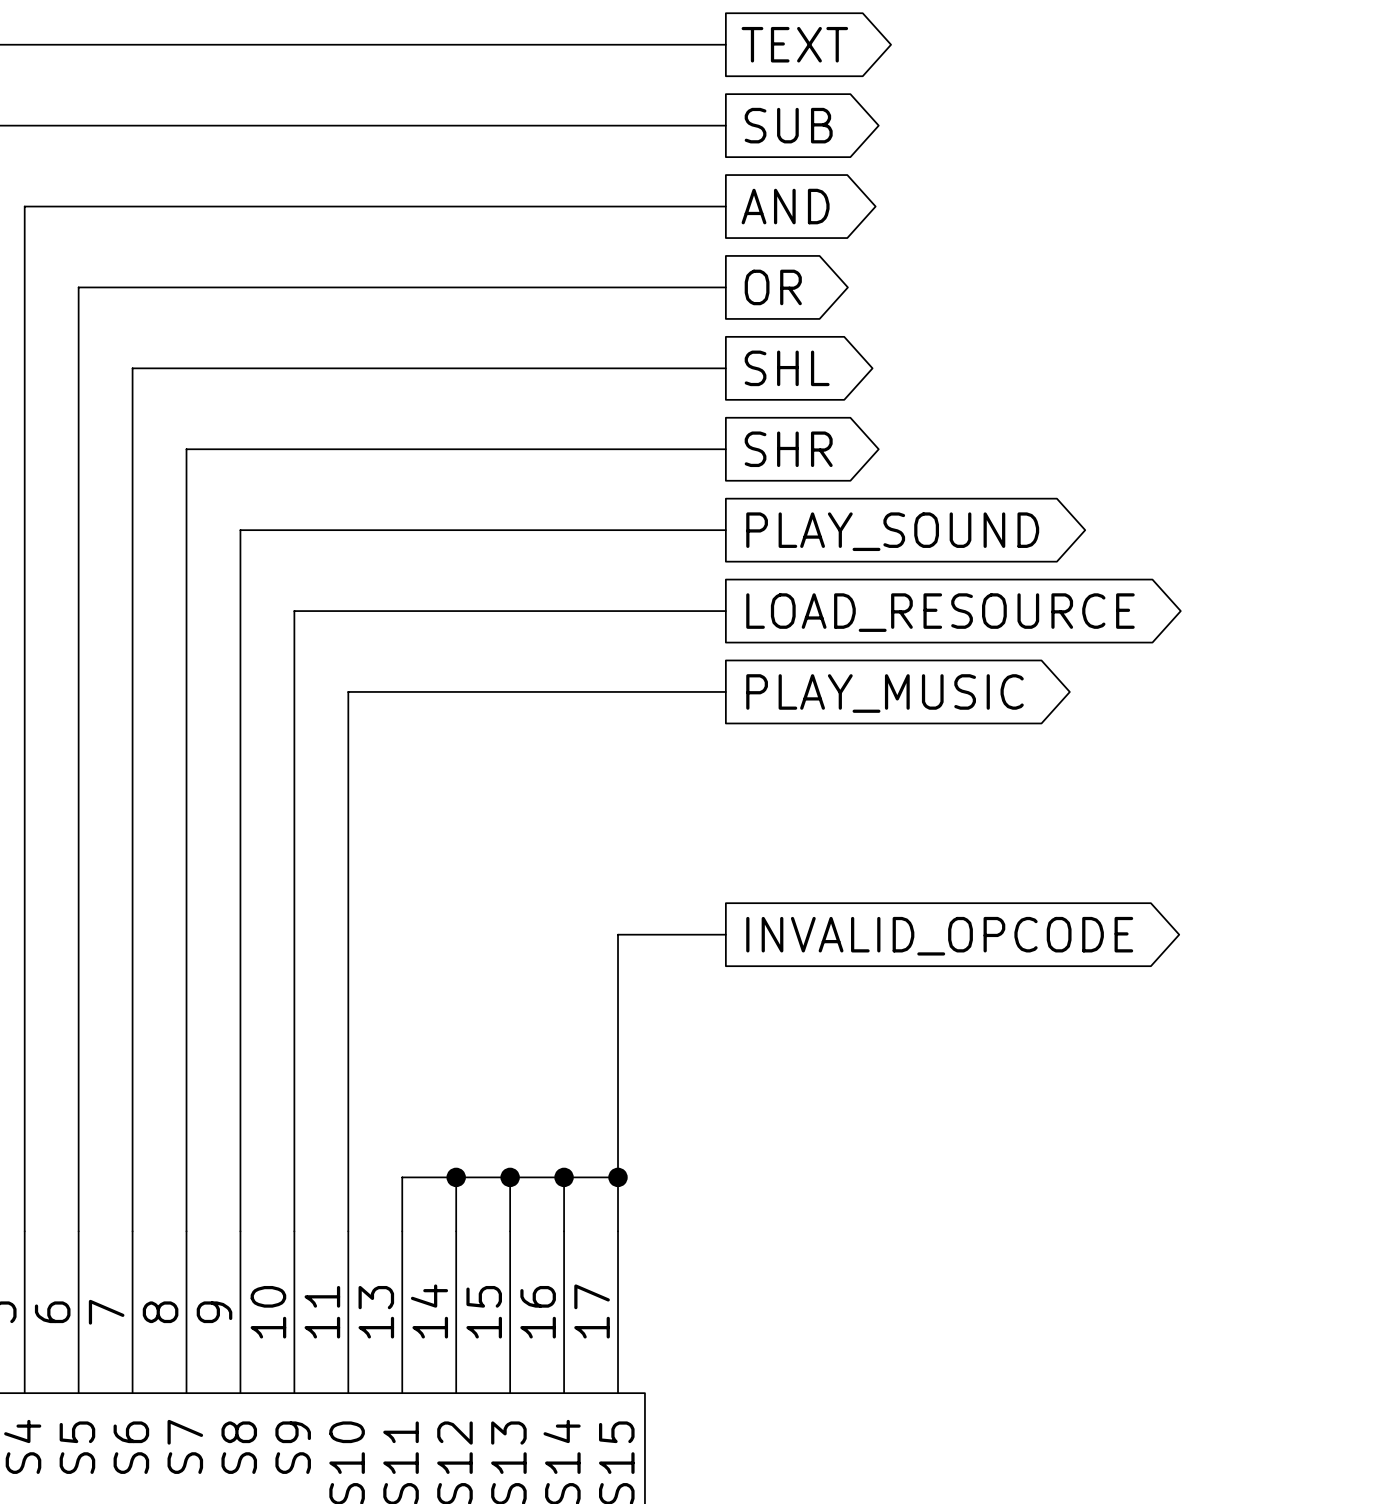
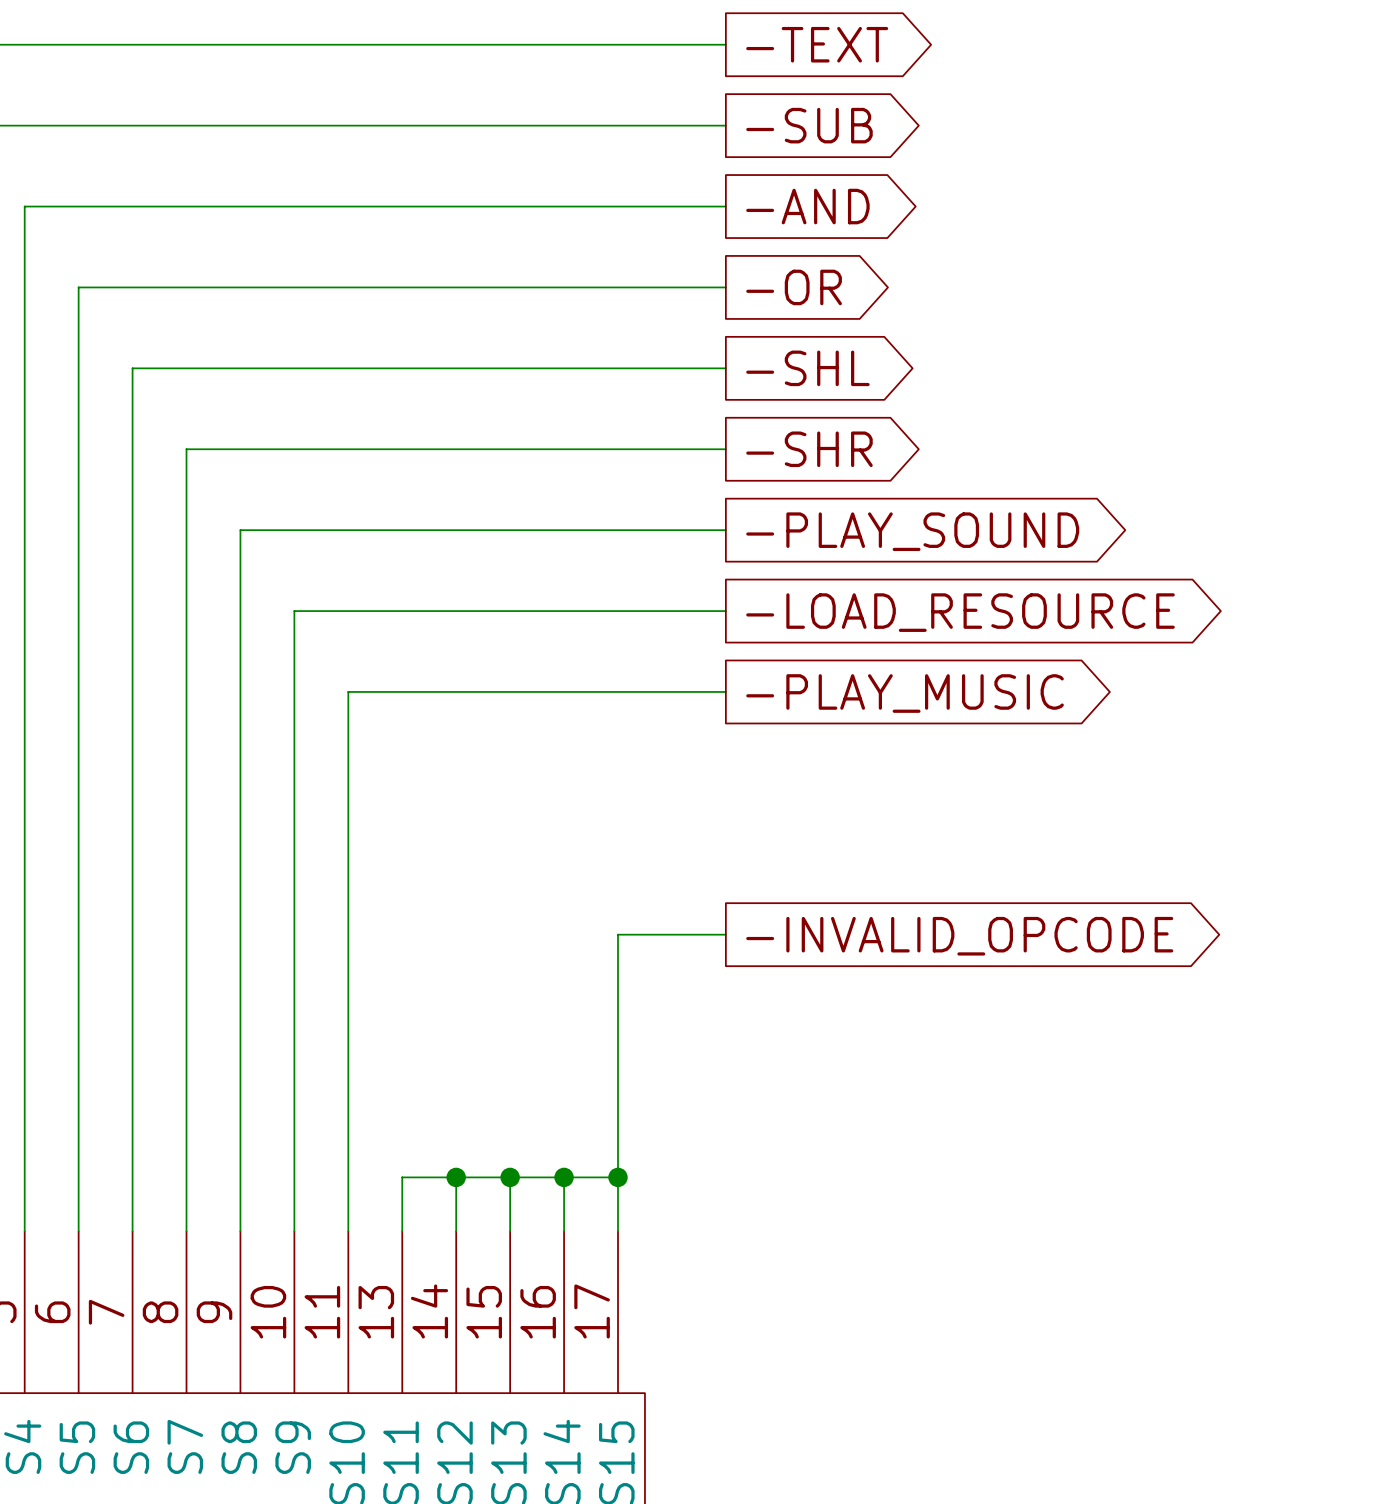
global label: TEXT (794, 44) -> -TEXT (817, 44)
global label: SUB (788, 125) -> -SUB (809, 125)
global label: AND (785, 206) -> -AND (807, 206)
global label: OR (773, 287) -> -OR (794, 287)
global label: SHL (787, 368) -> -SHL (807, 368)
global label: SHR (788, 449) -> -SHR (809, 449)
global label: PLAY_SOUND (892, 531) -> -PLAY_SOUND (912, 531)
global label: LOAD_RESOURCE (940, 612) -> -LOAD_RESOURCE (960, 612)
global label: PLAY_MUSIC (885, 693) -> -PLAY_MUSIC (905, 693)
global label: INVALID_OPCODE (939, 936) -> -INVALID_OPCODE (959, 936)

